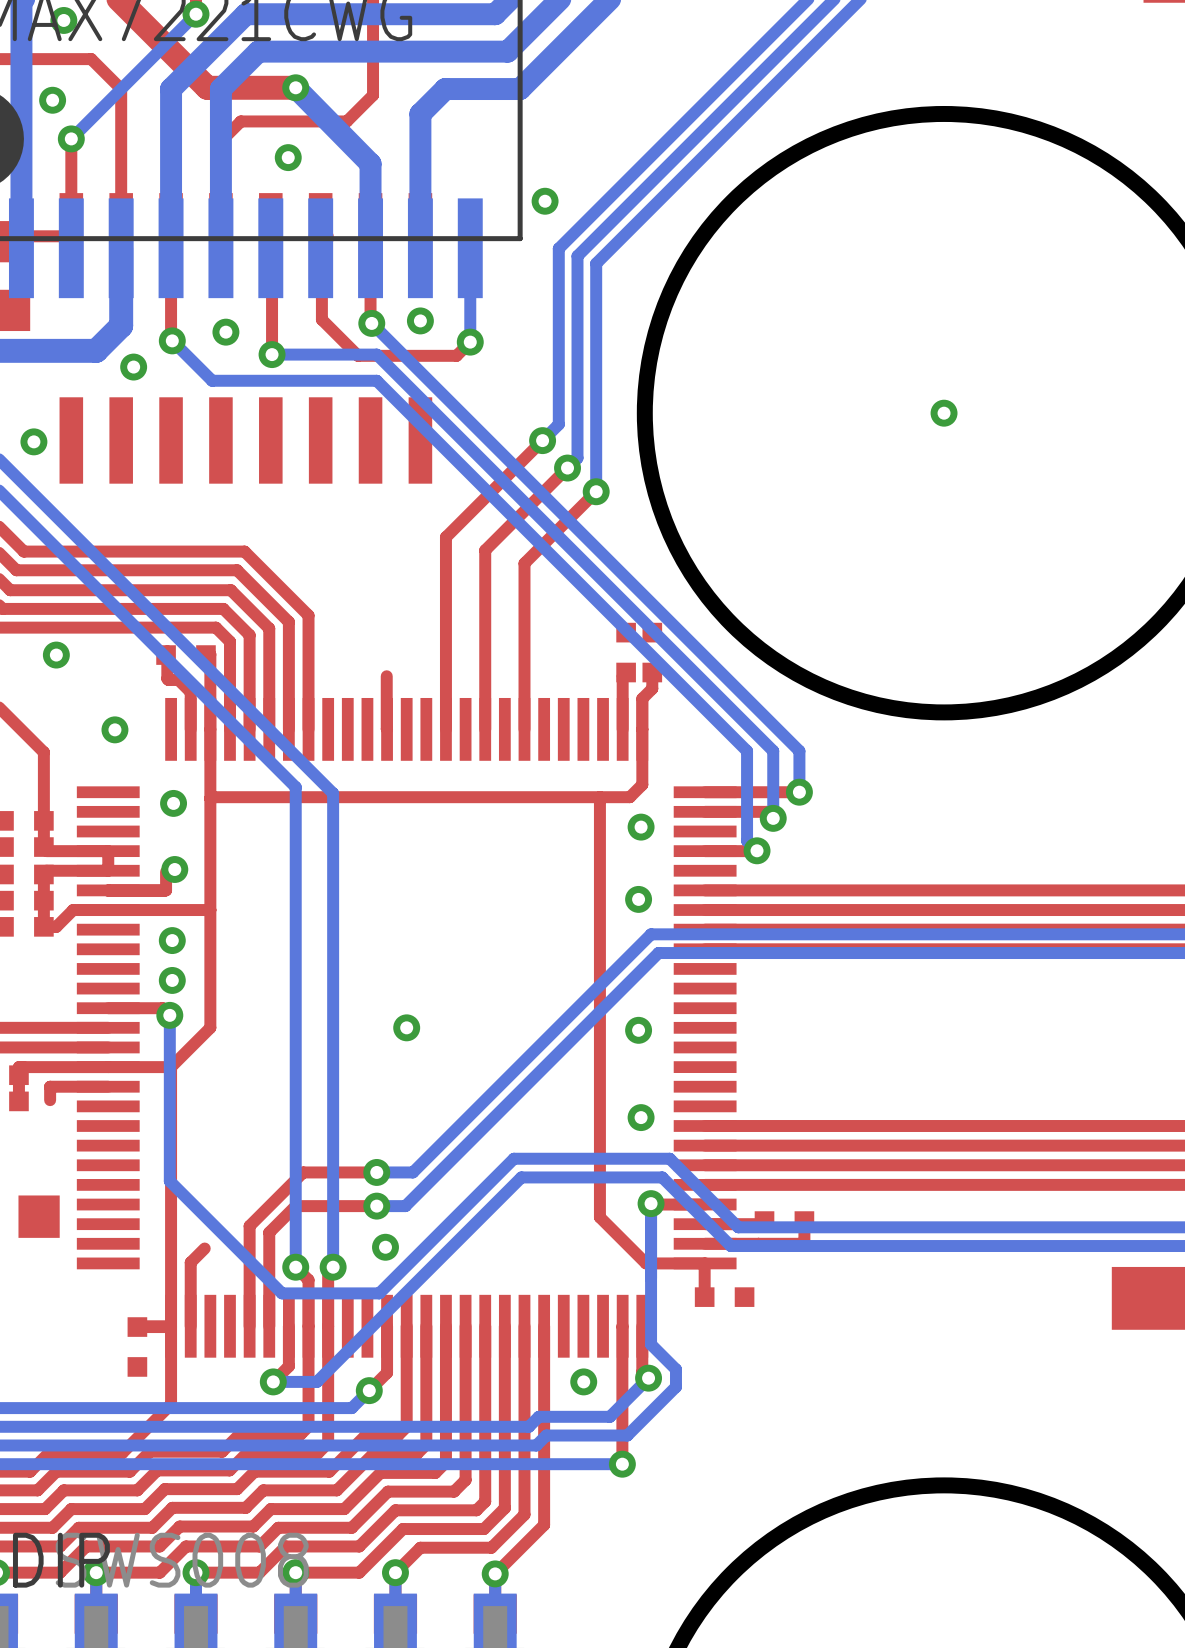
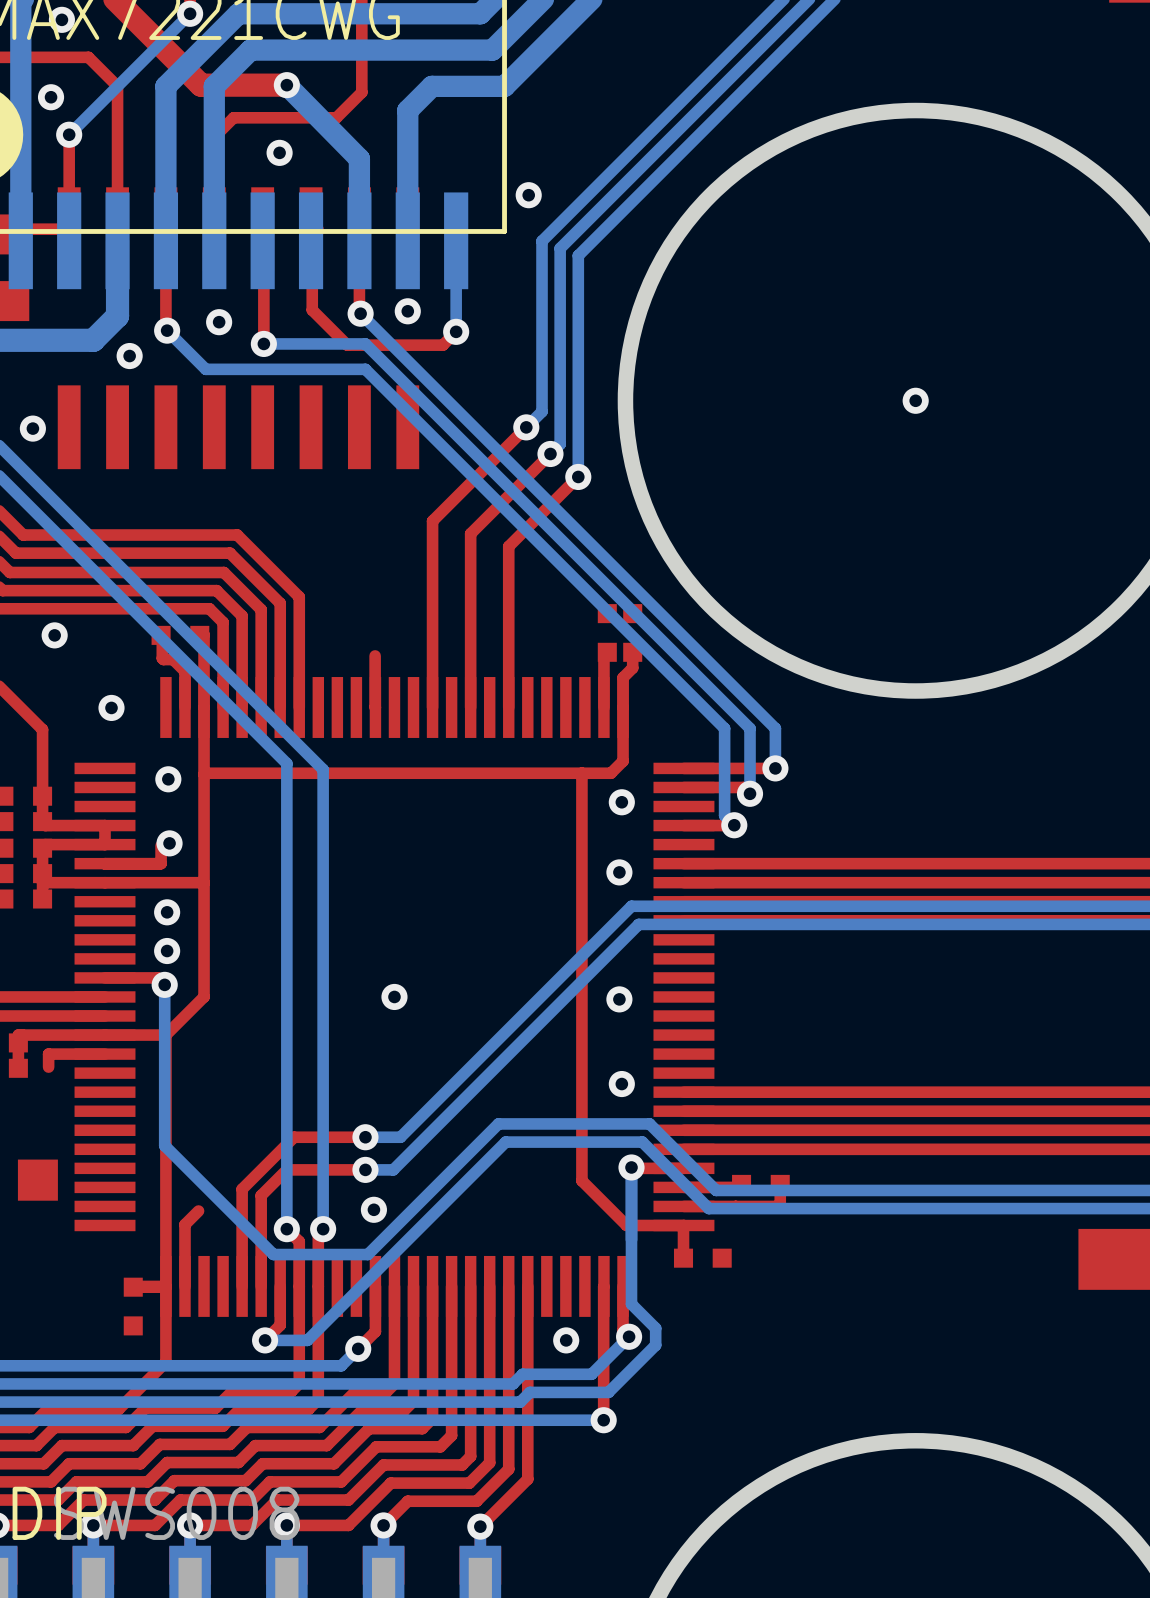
top track: (73, 910) (56, 926) (43, 926) -> (70, 882) (42, 882)

